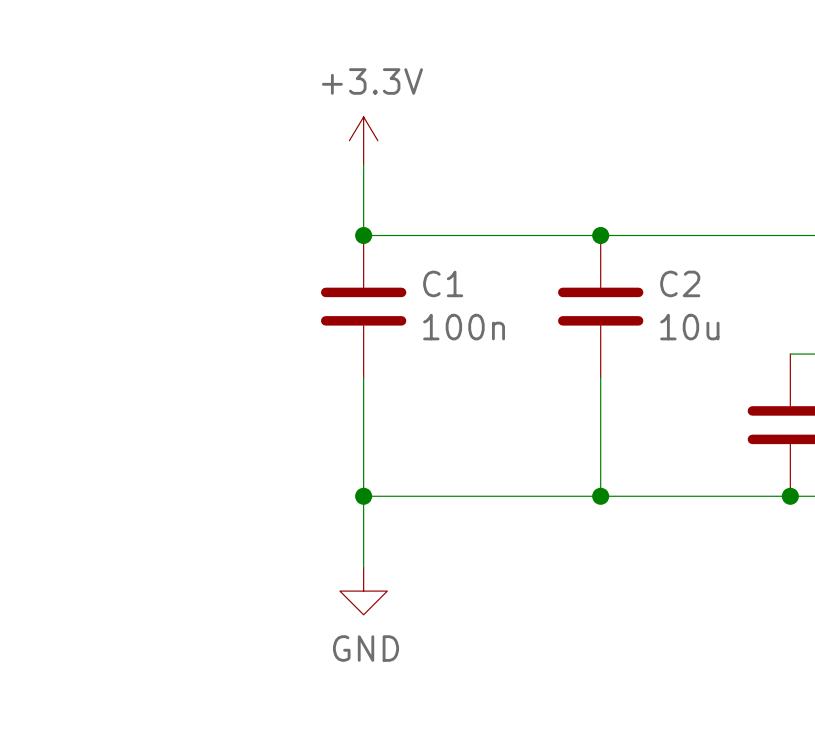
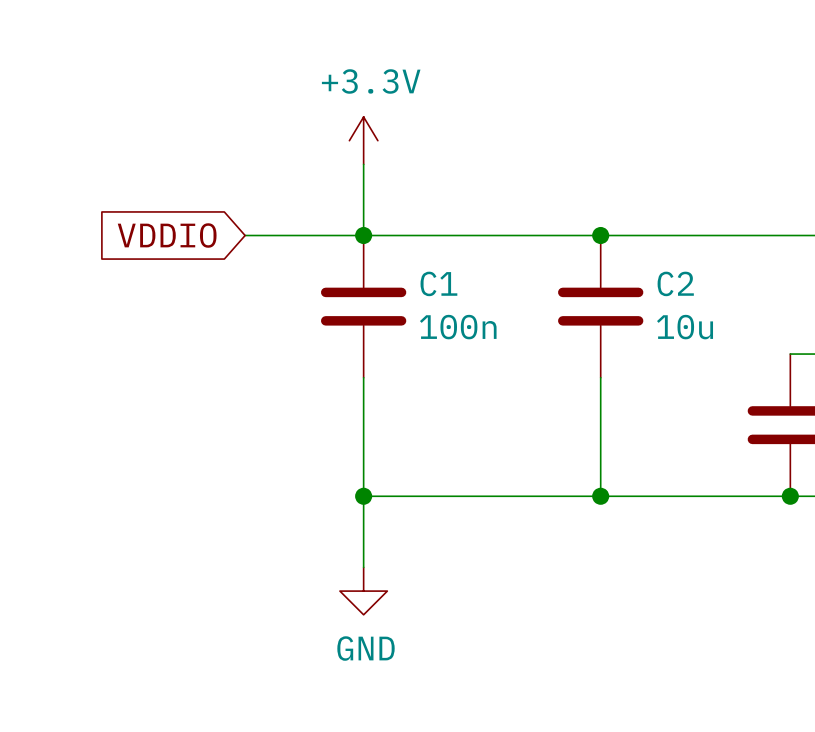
global label: none -> VDDIO (167, 235)
wire: none -> (245, 235) (363, 235)

